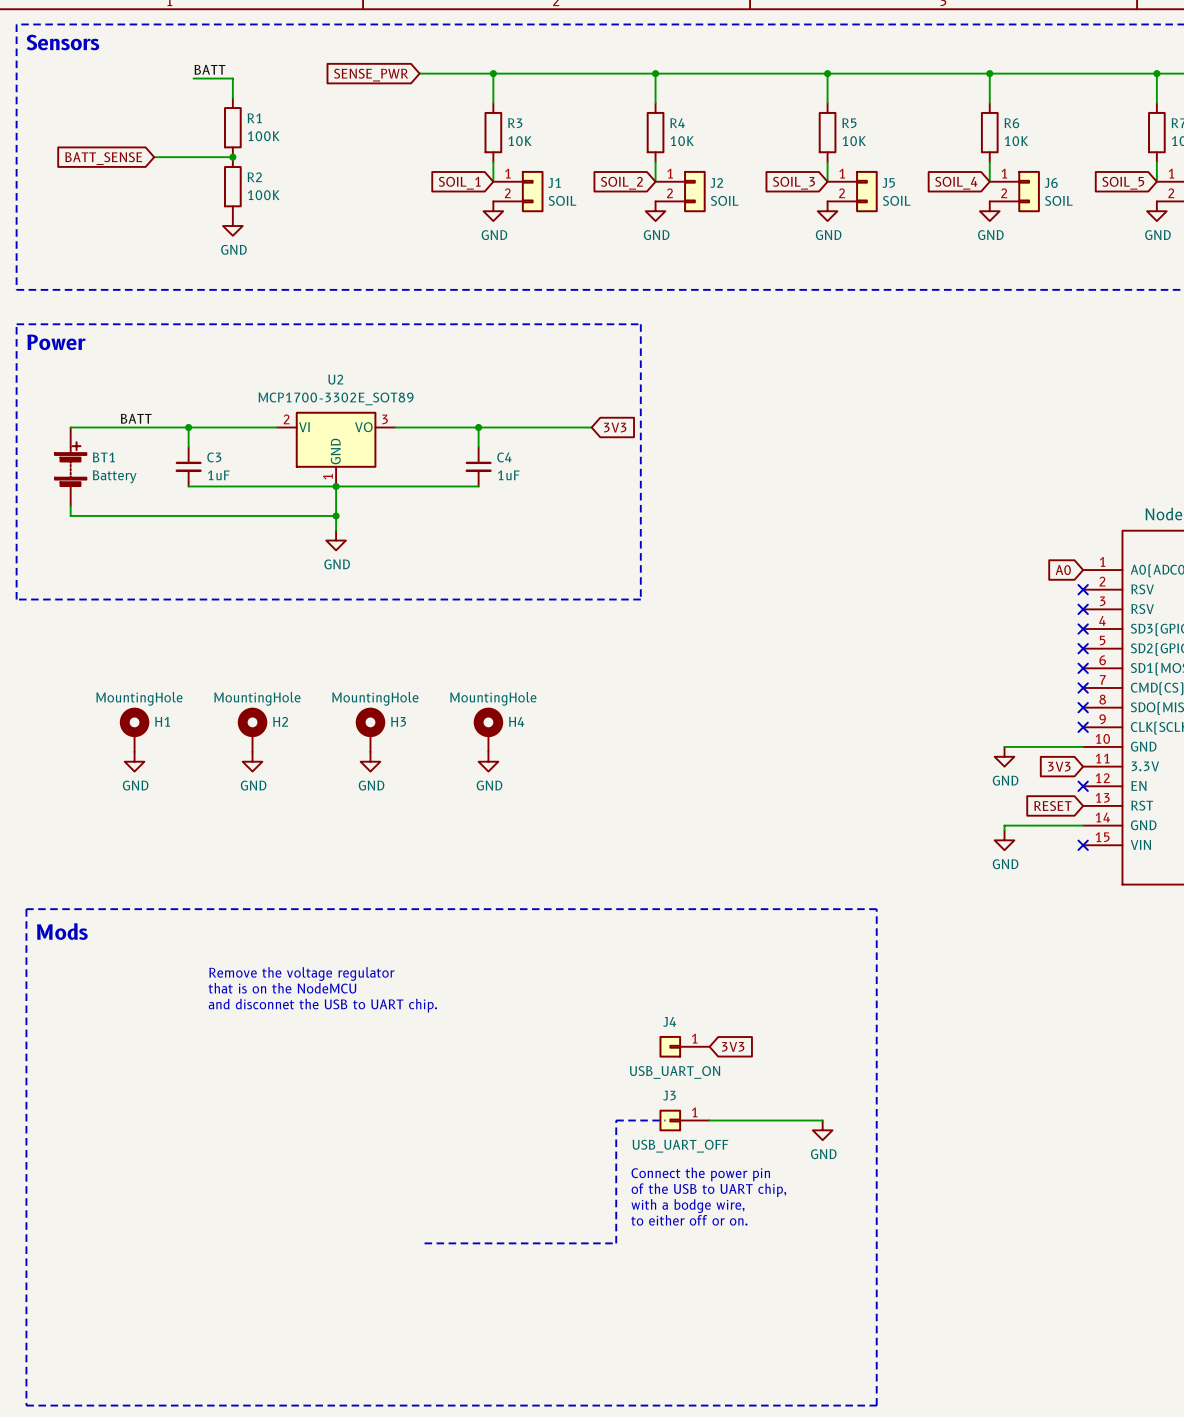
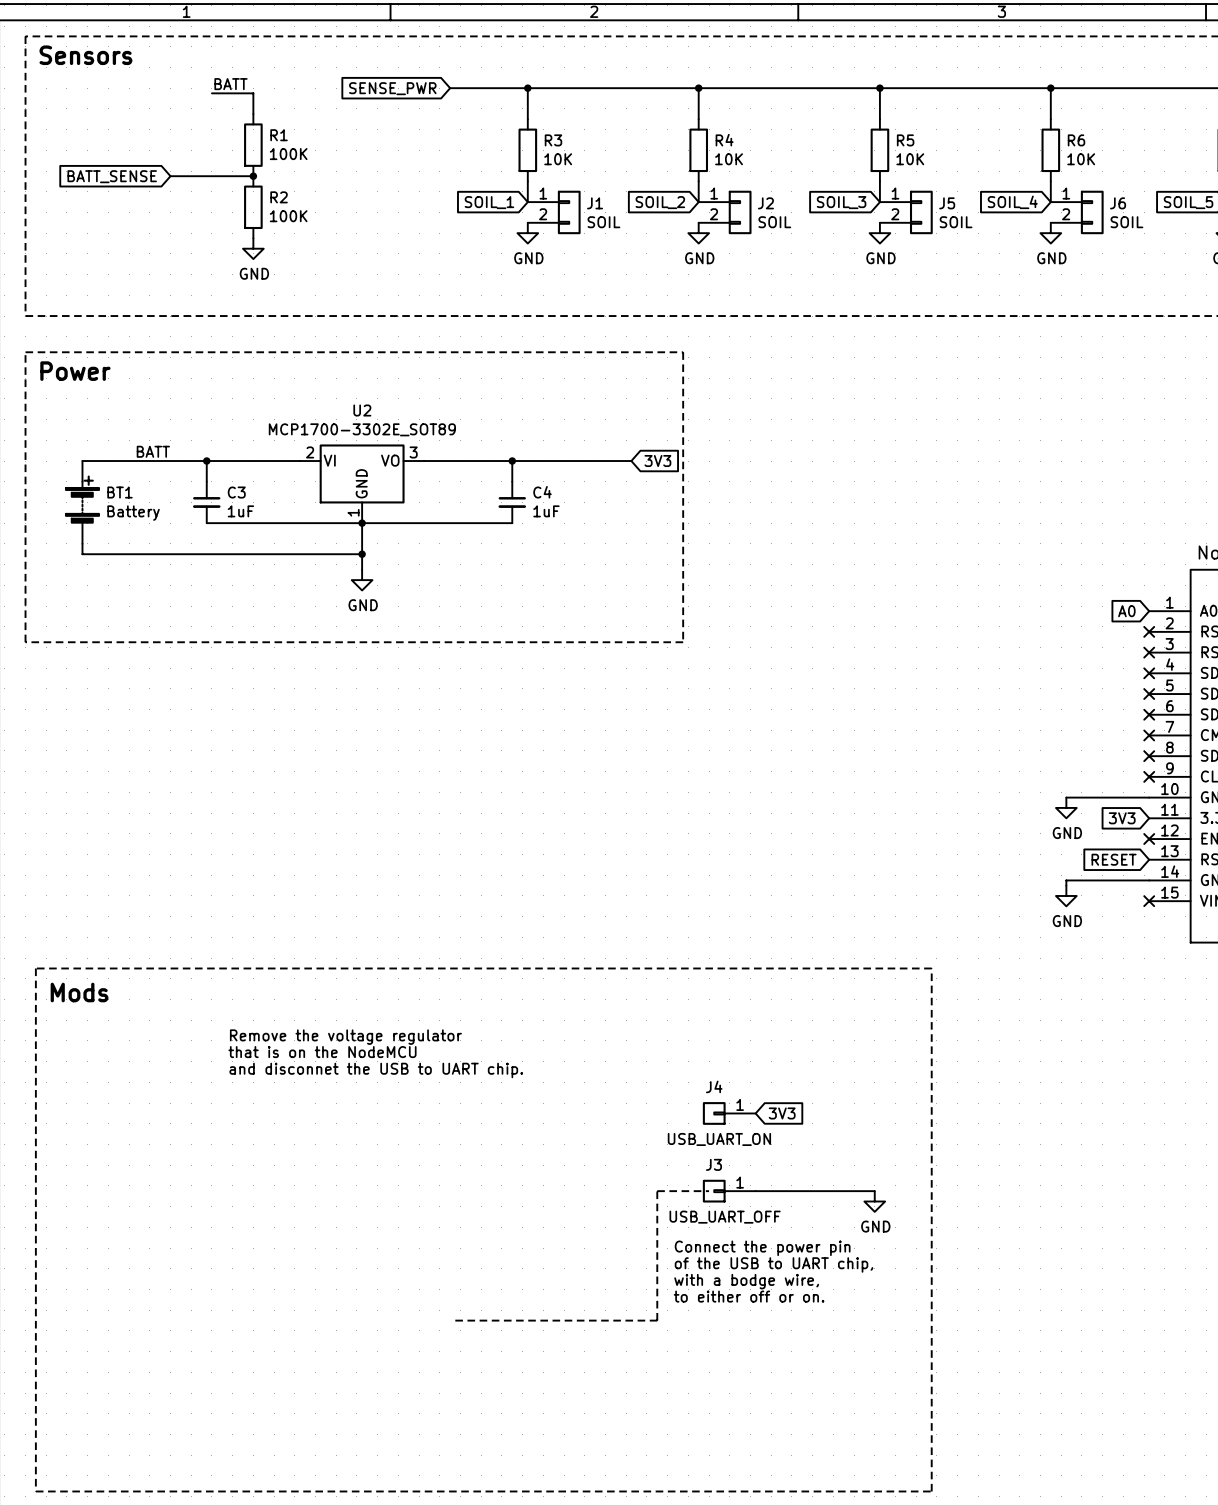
H1: MountingHole (134, 729) -> none
H2: MountingHole (252, 729) -> none
H3: MountingHole (370, 729) -> none
H4: MountingHole (488, 729) -> none
power symbol: GND (134, 761) -> none
power symbol: GND (252, 761) -> none
power symbol: GND (370, 761) -> none
power symbol: GND (488, 761) -> none

